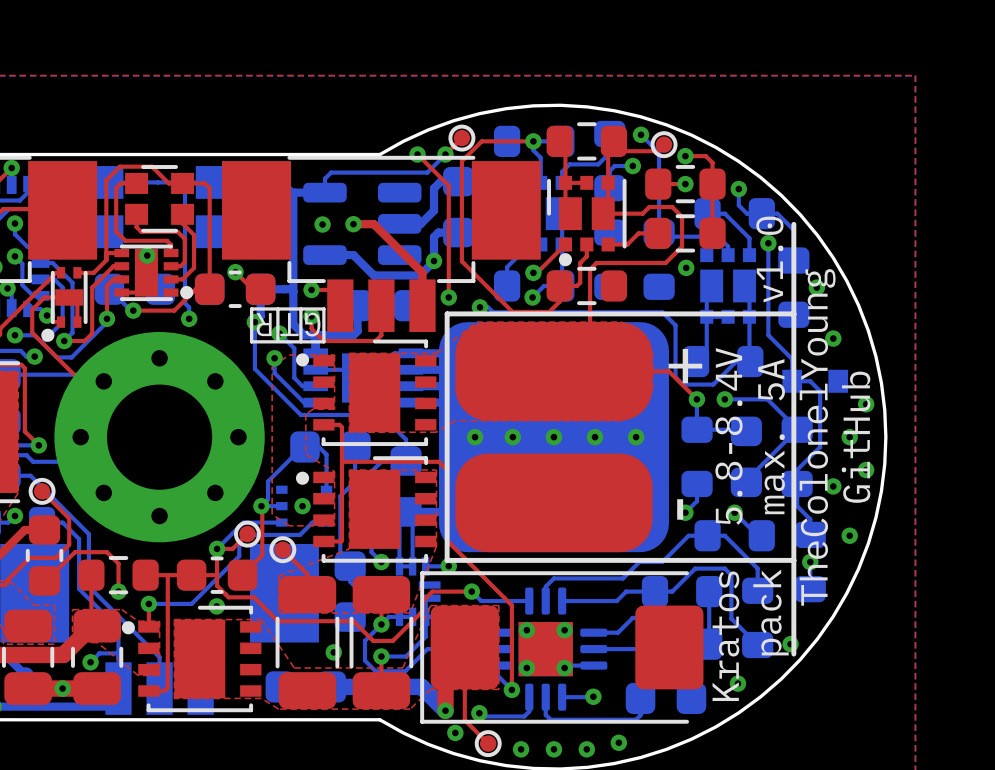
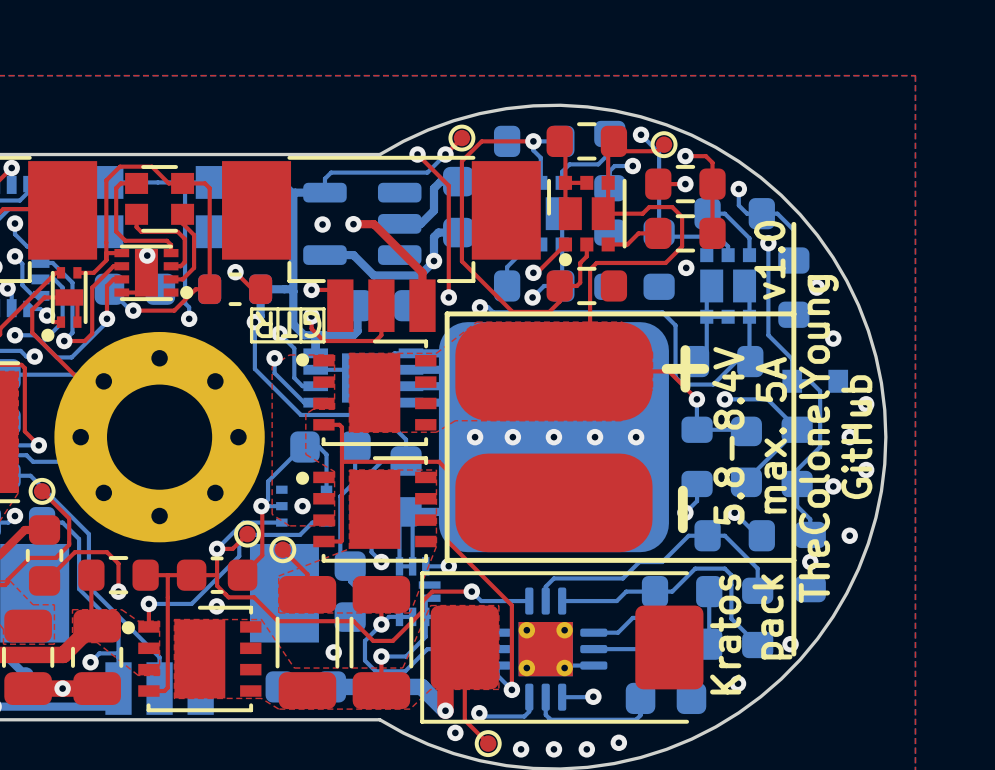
part: (235, 289) -> none
part: none -> (235, 289)

